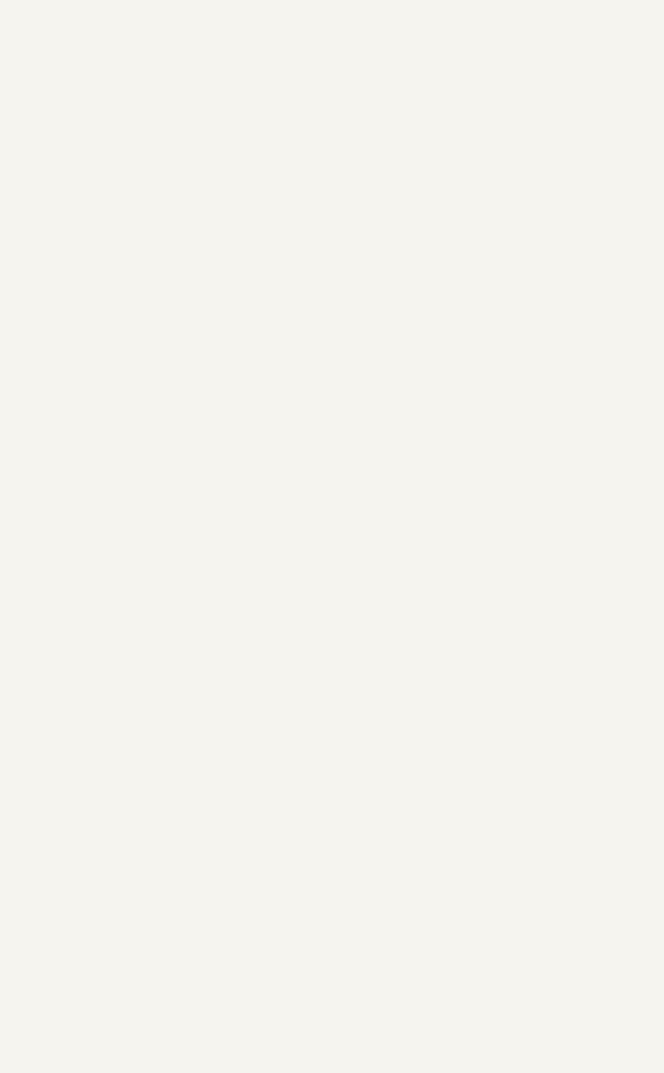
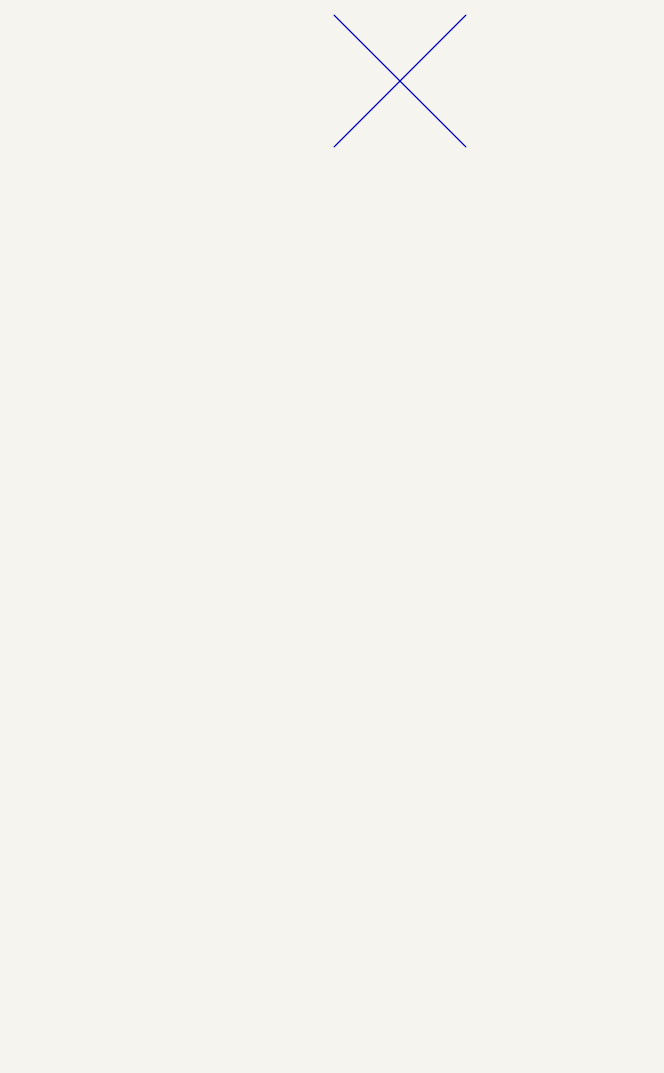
no-connect mark: none -> (399, 81)

